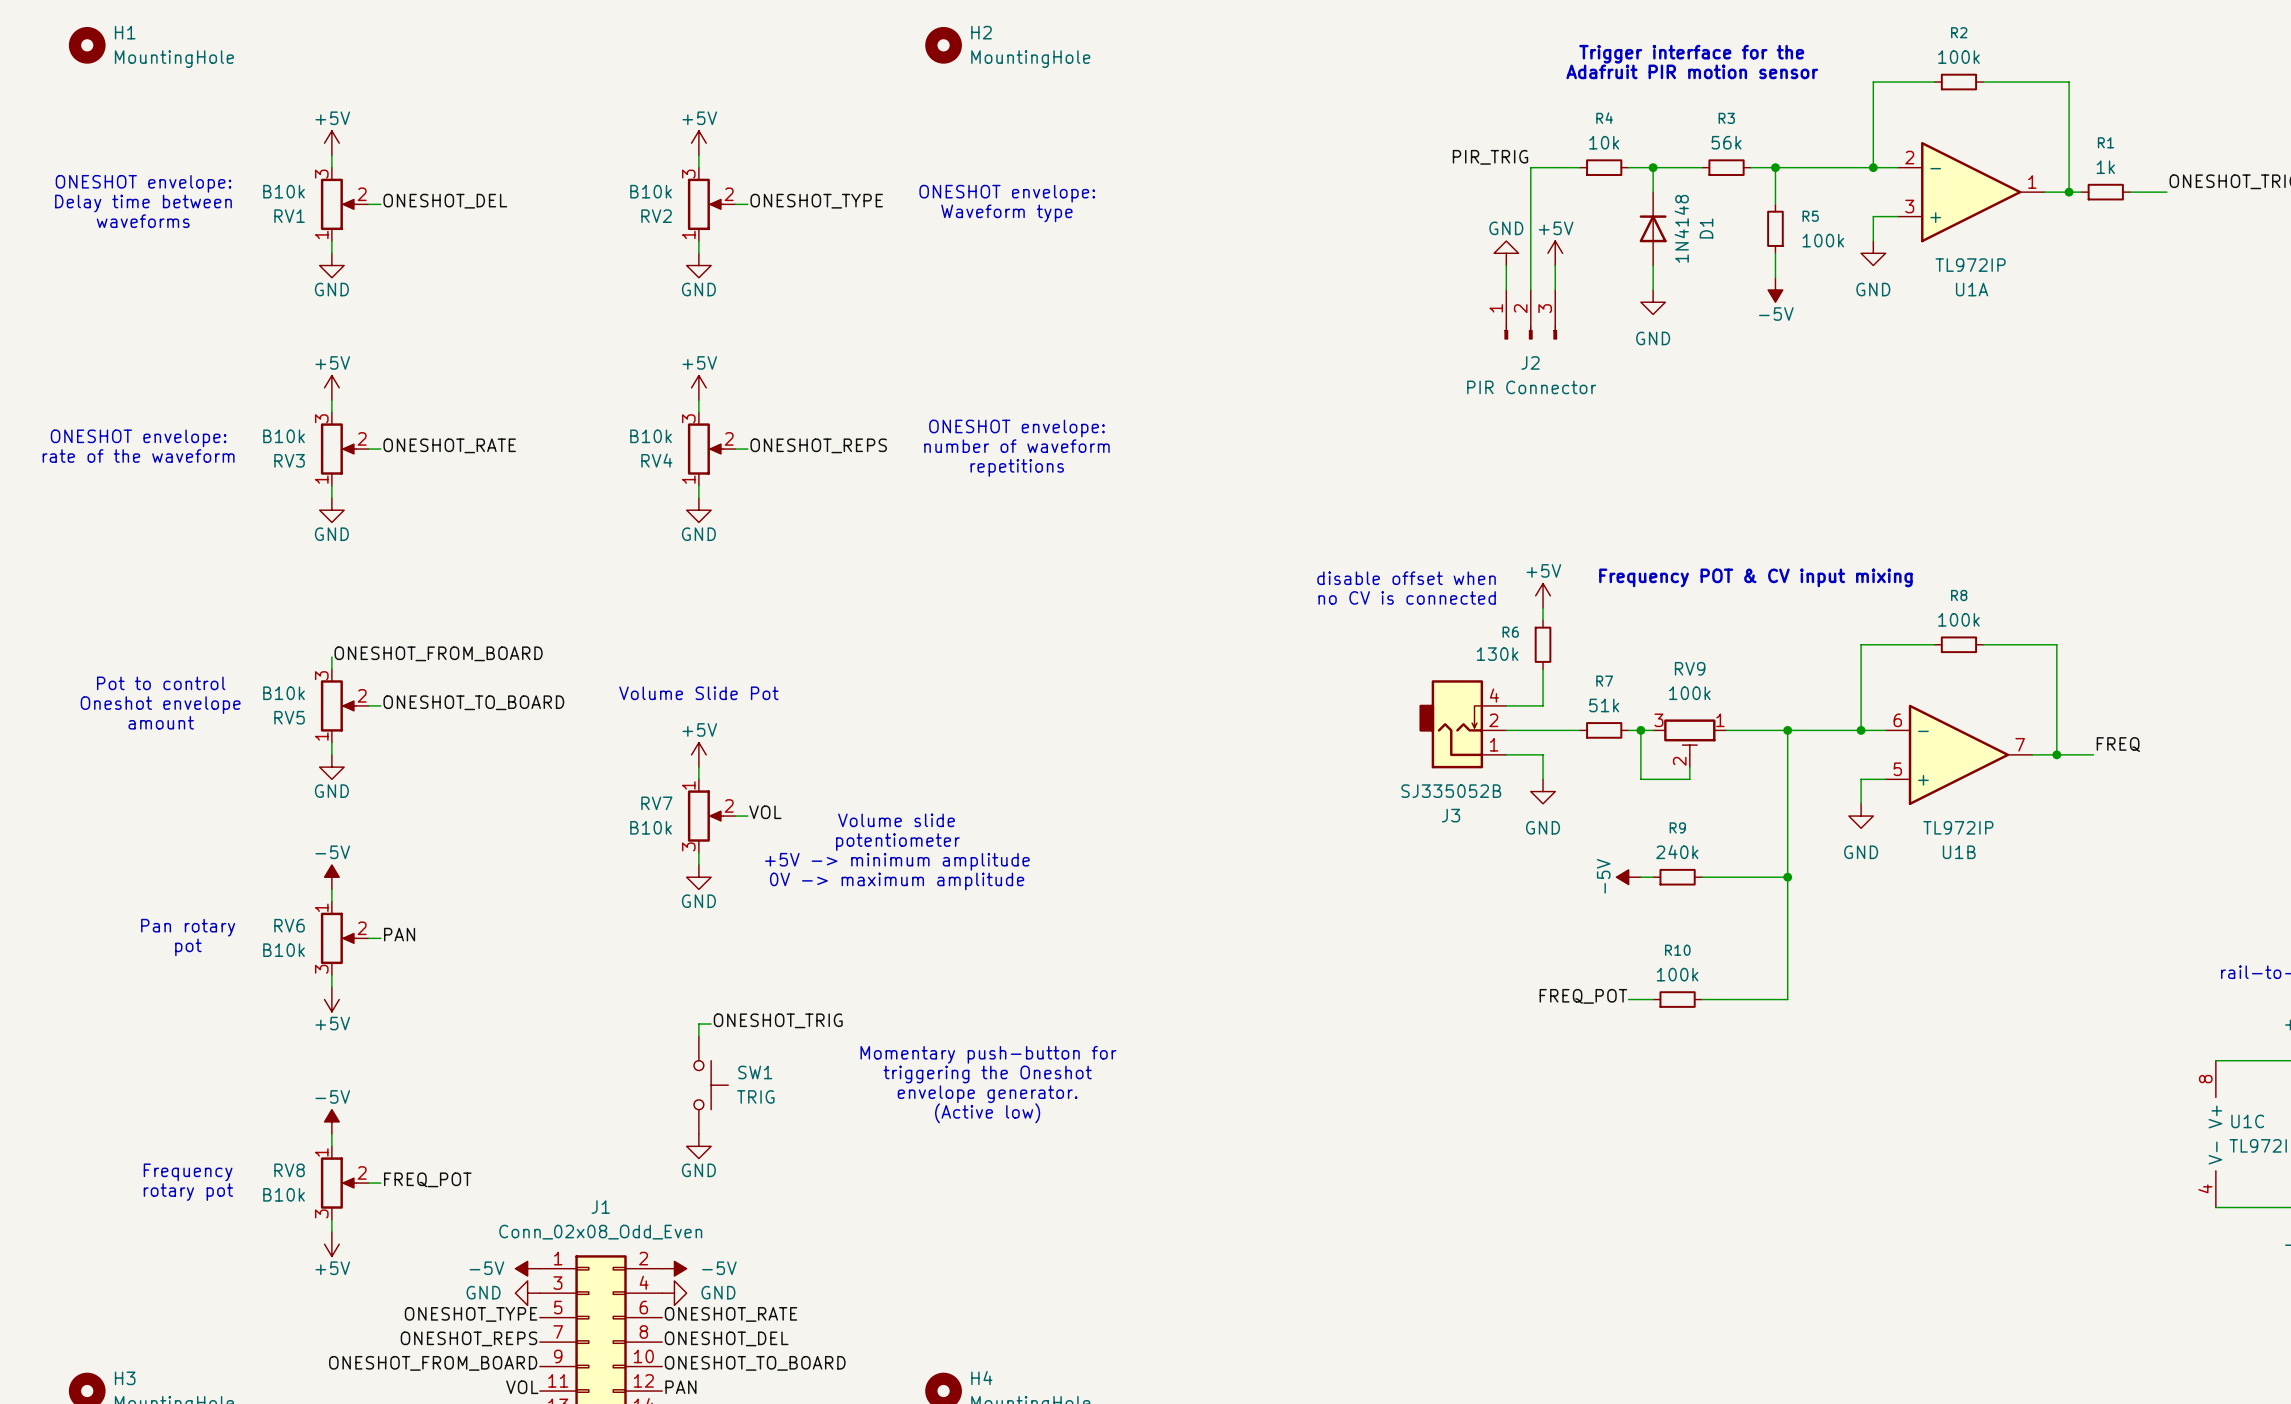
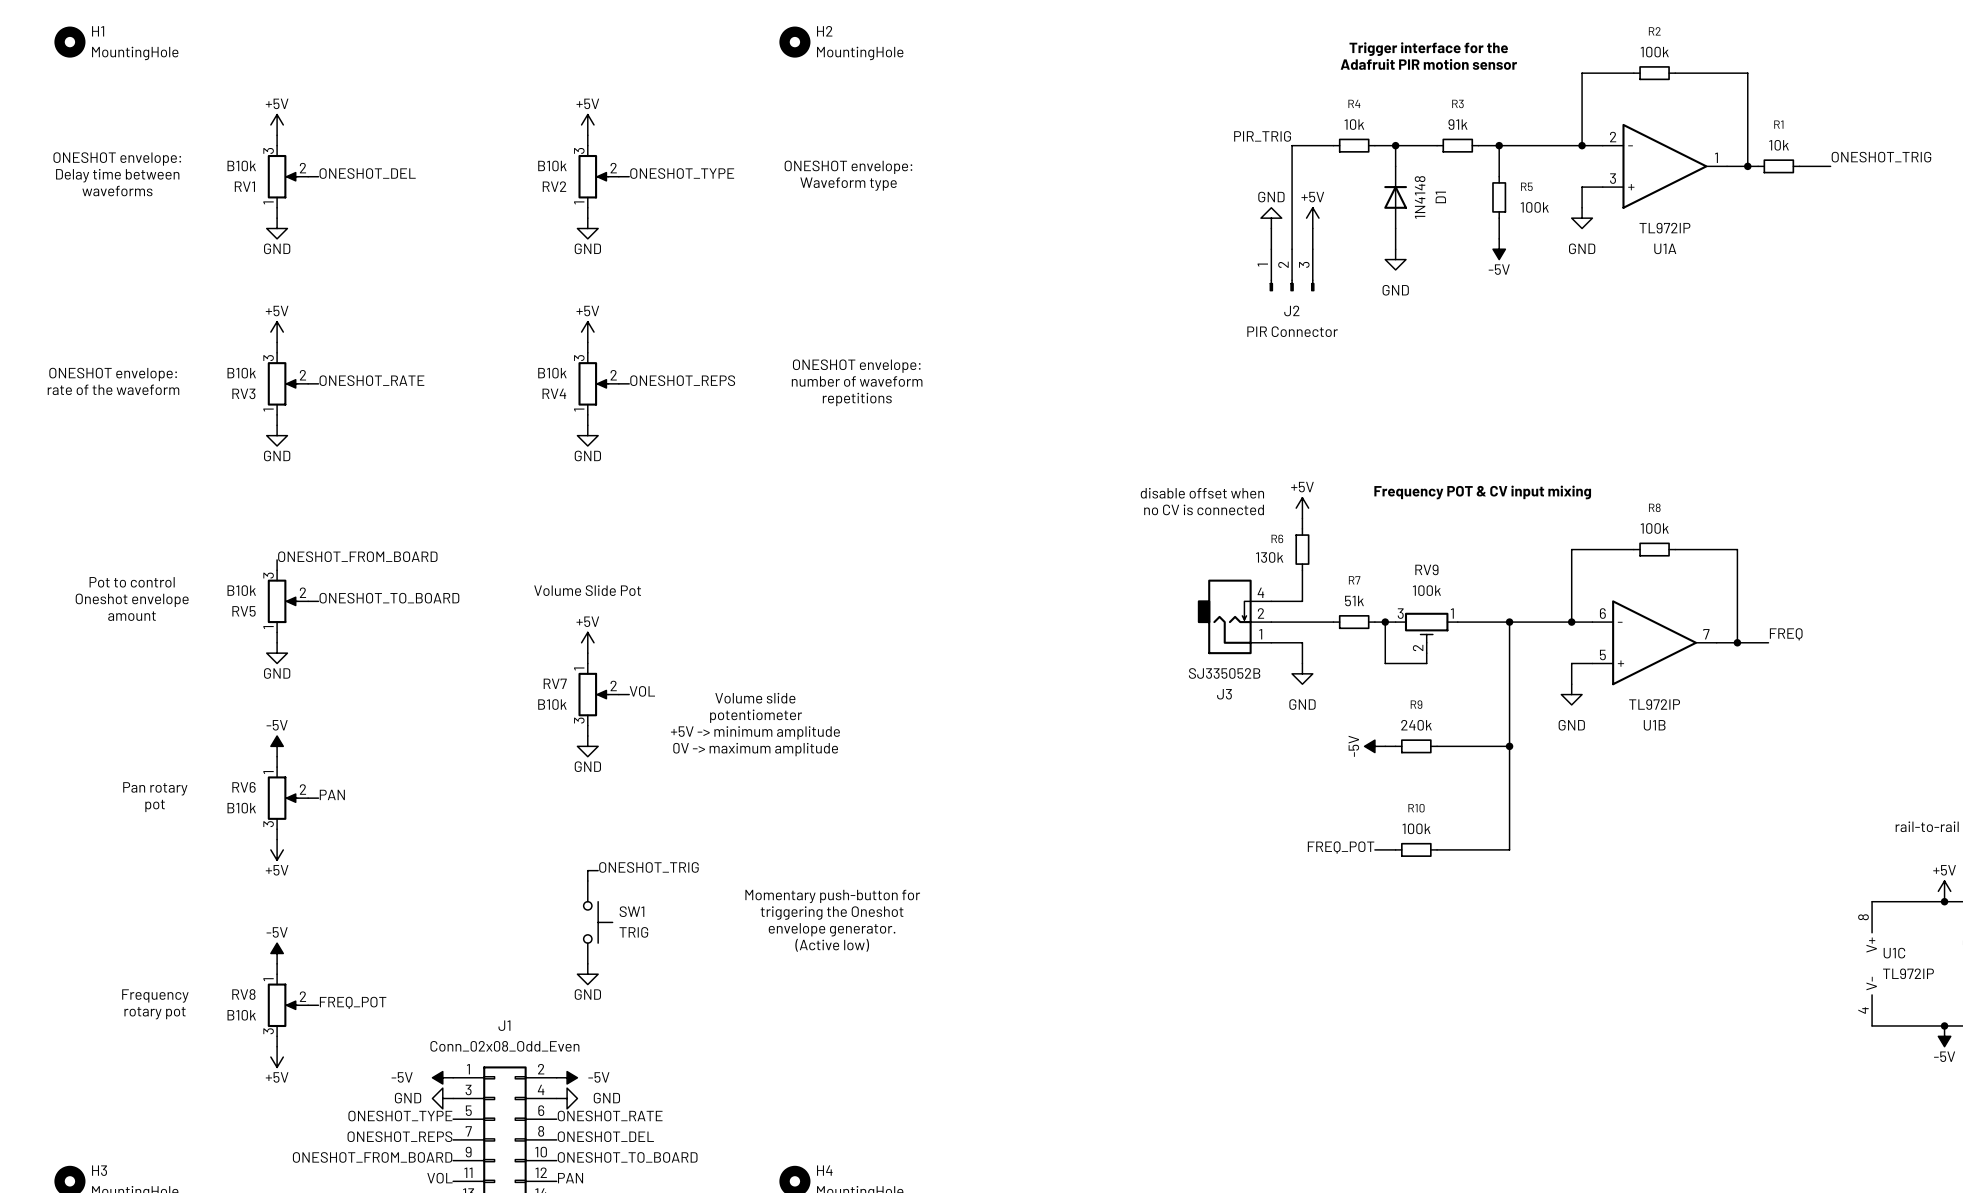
R3 value: 56k (1726, 142) -> 91k (1457, 124)
R1 value: 1k (2105, 167) -> 10k (1779, 145)

